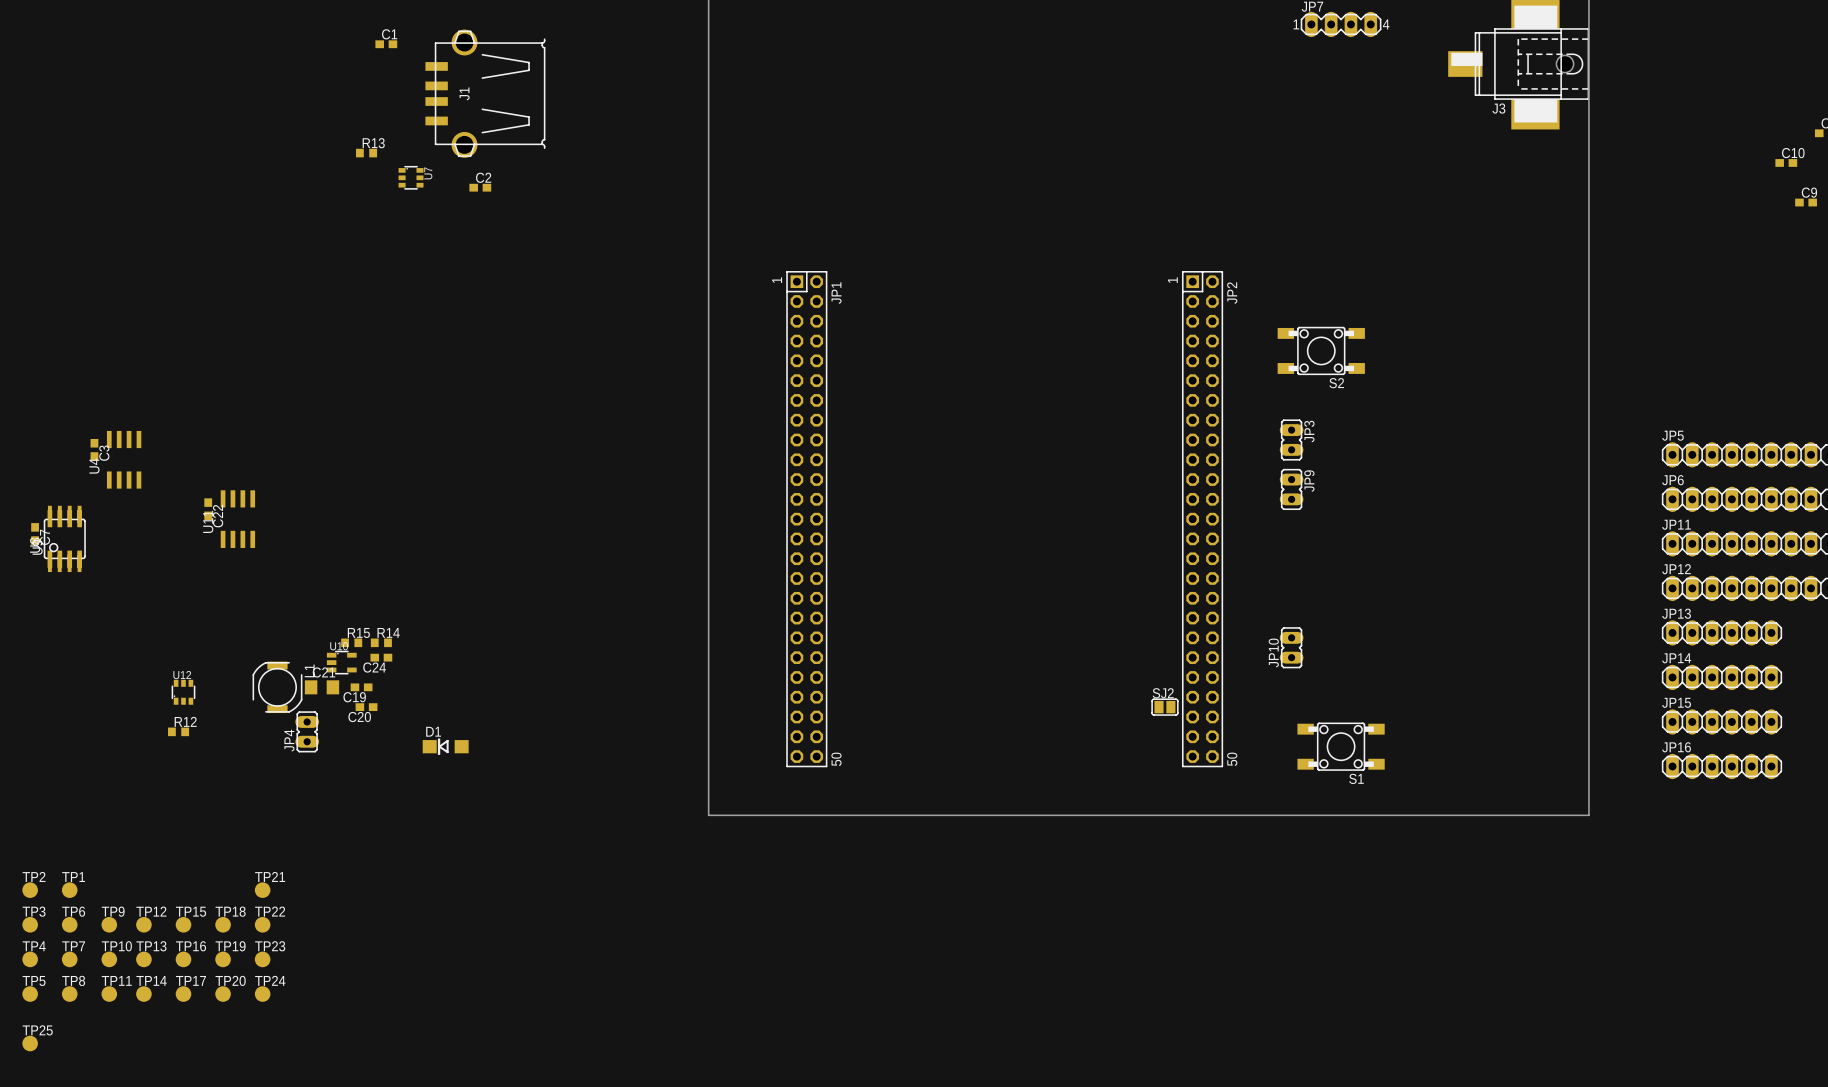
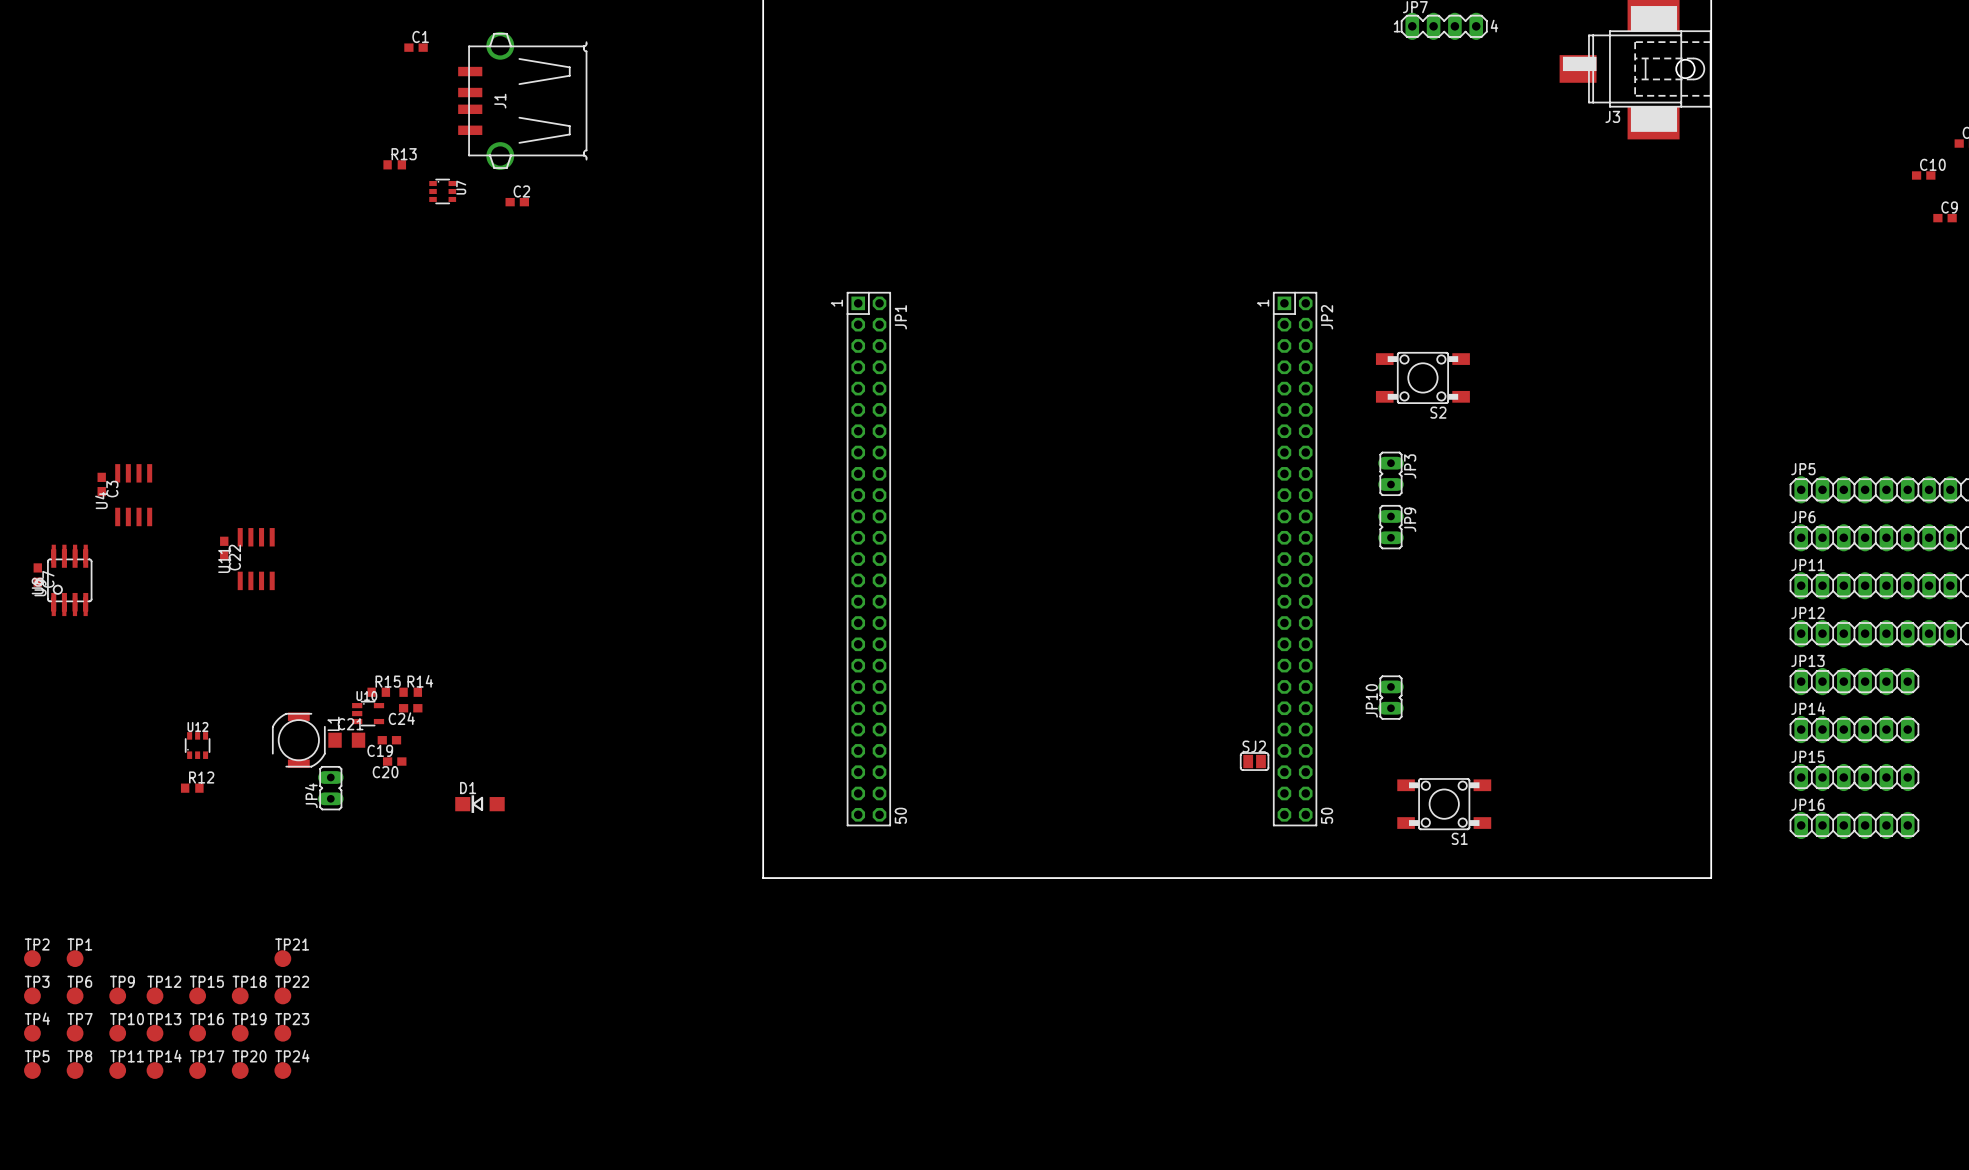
TP25: (30, 1043) -> none

